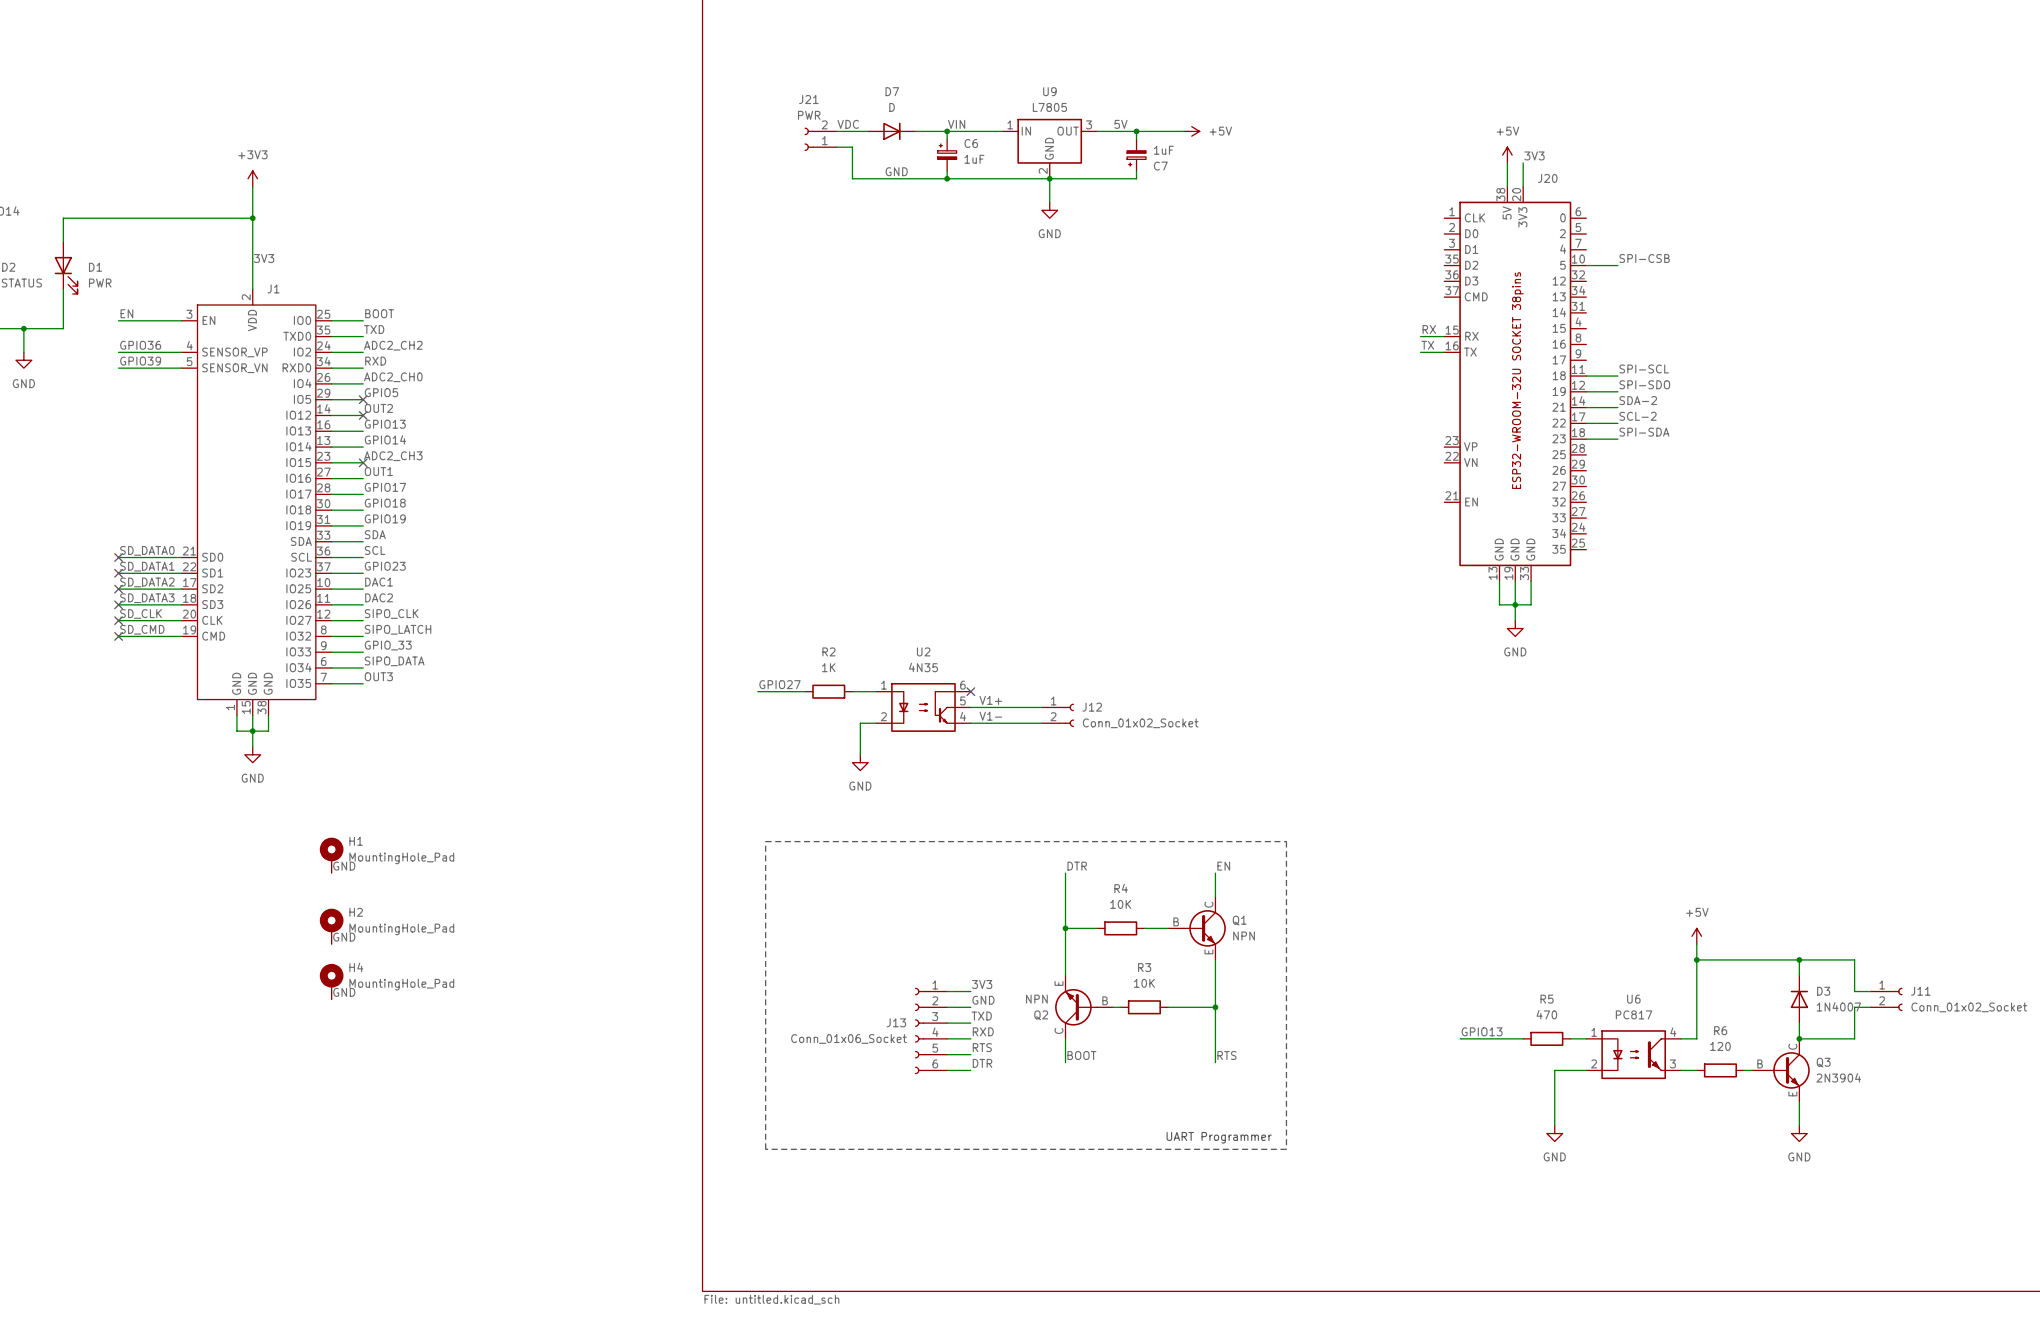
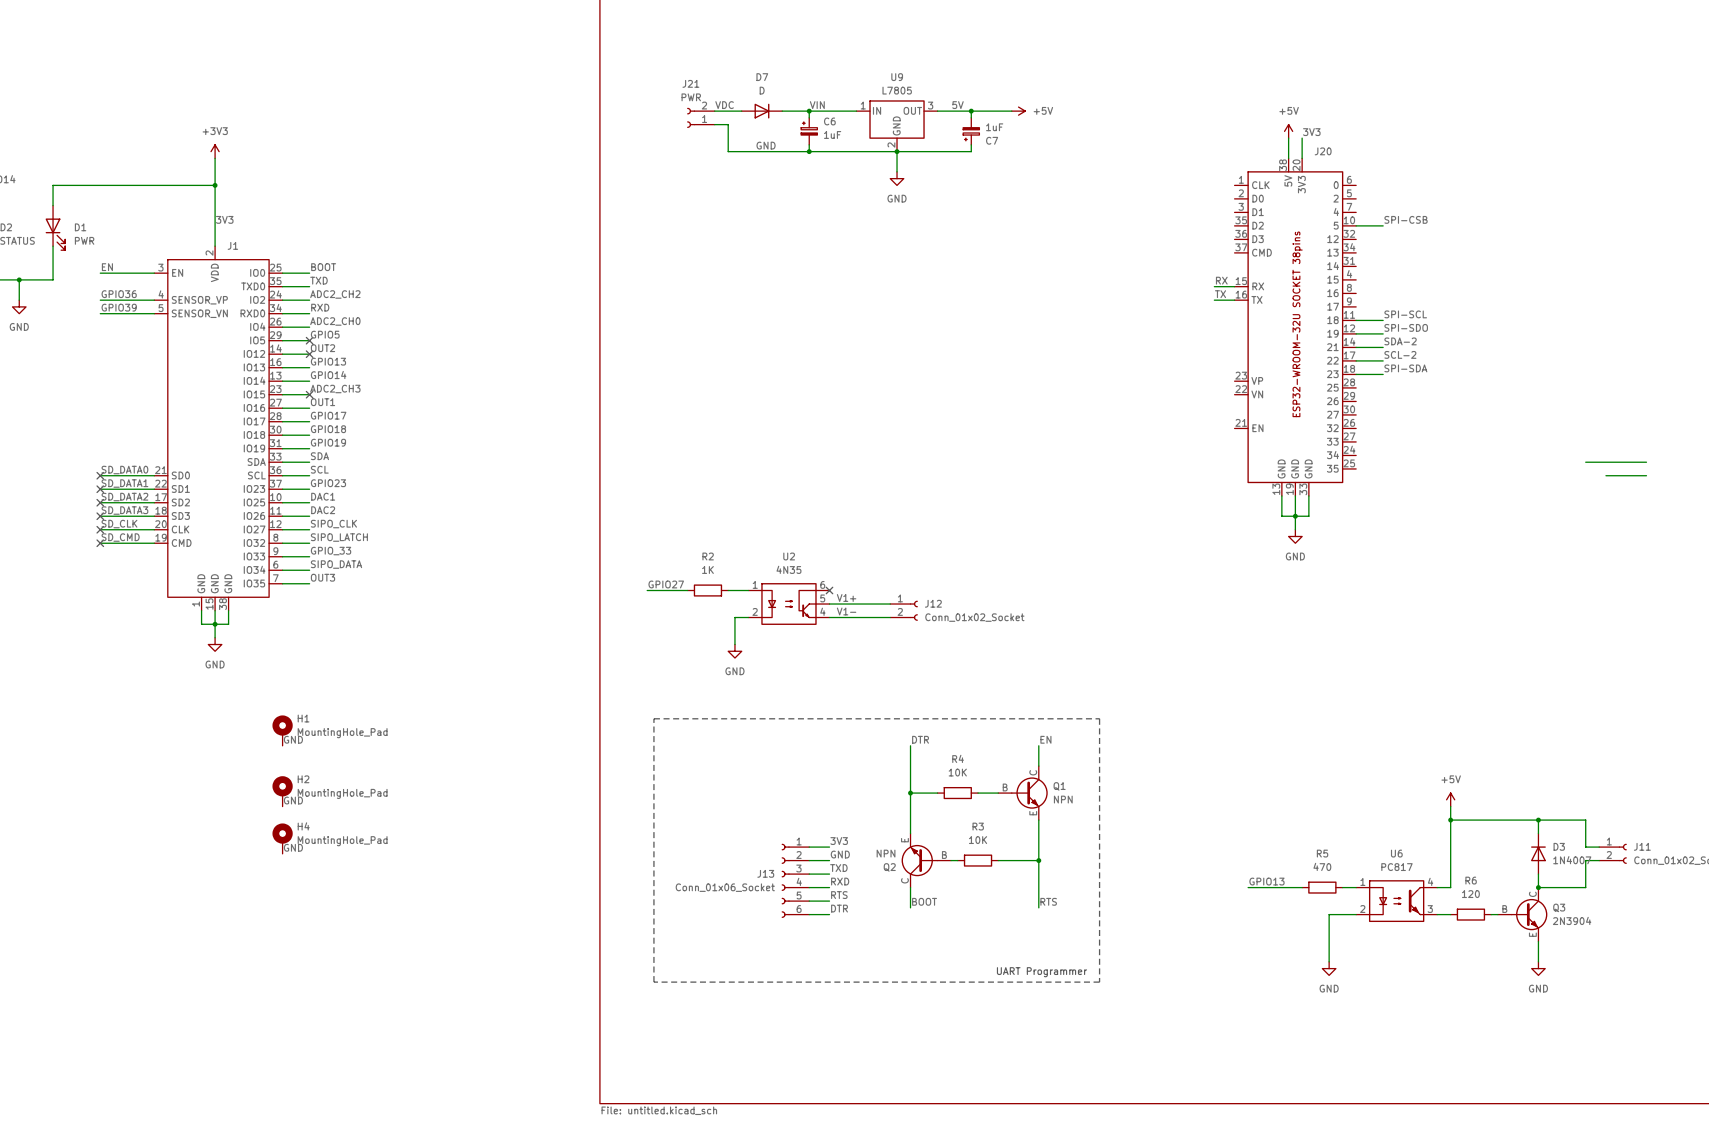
wire: none -> (1585, 462) (1646, 462)
wire: none -> (1605, 475) (1646, 475)

